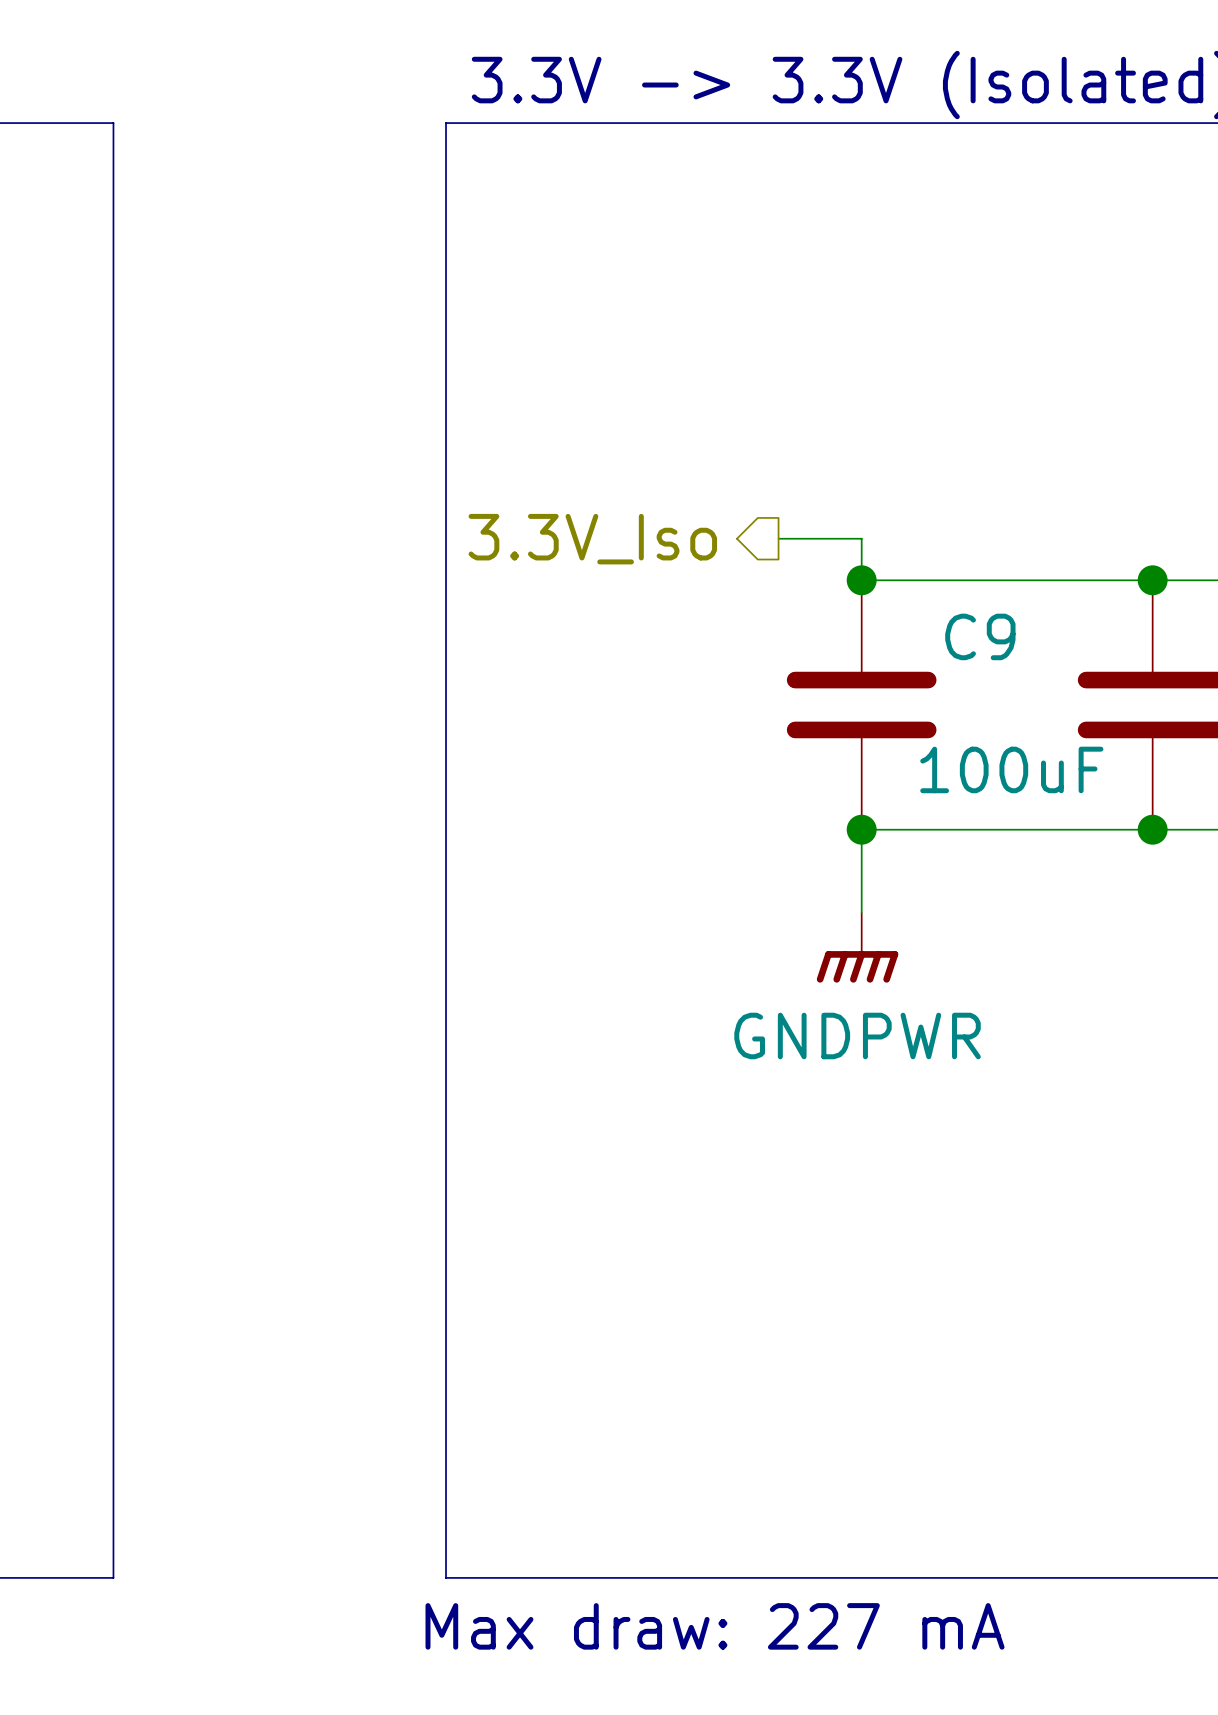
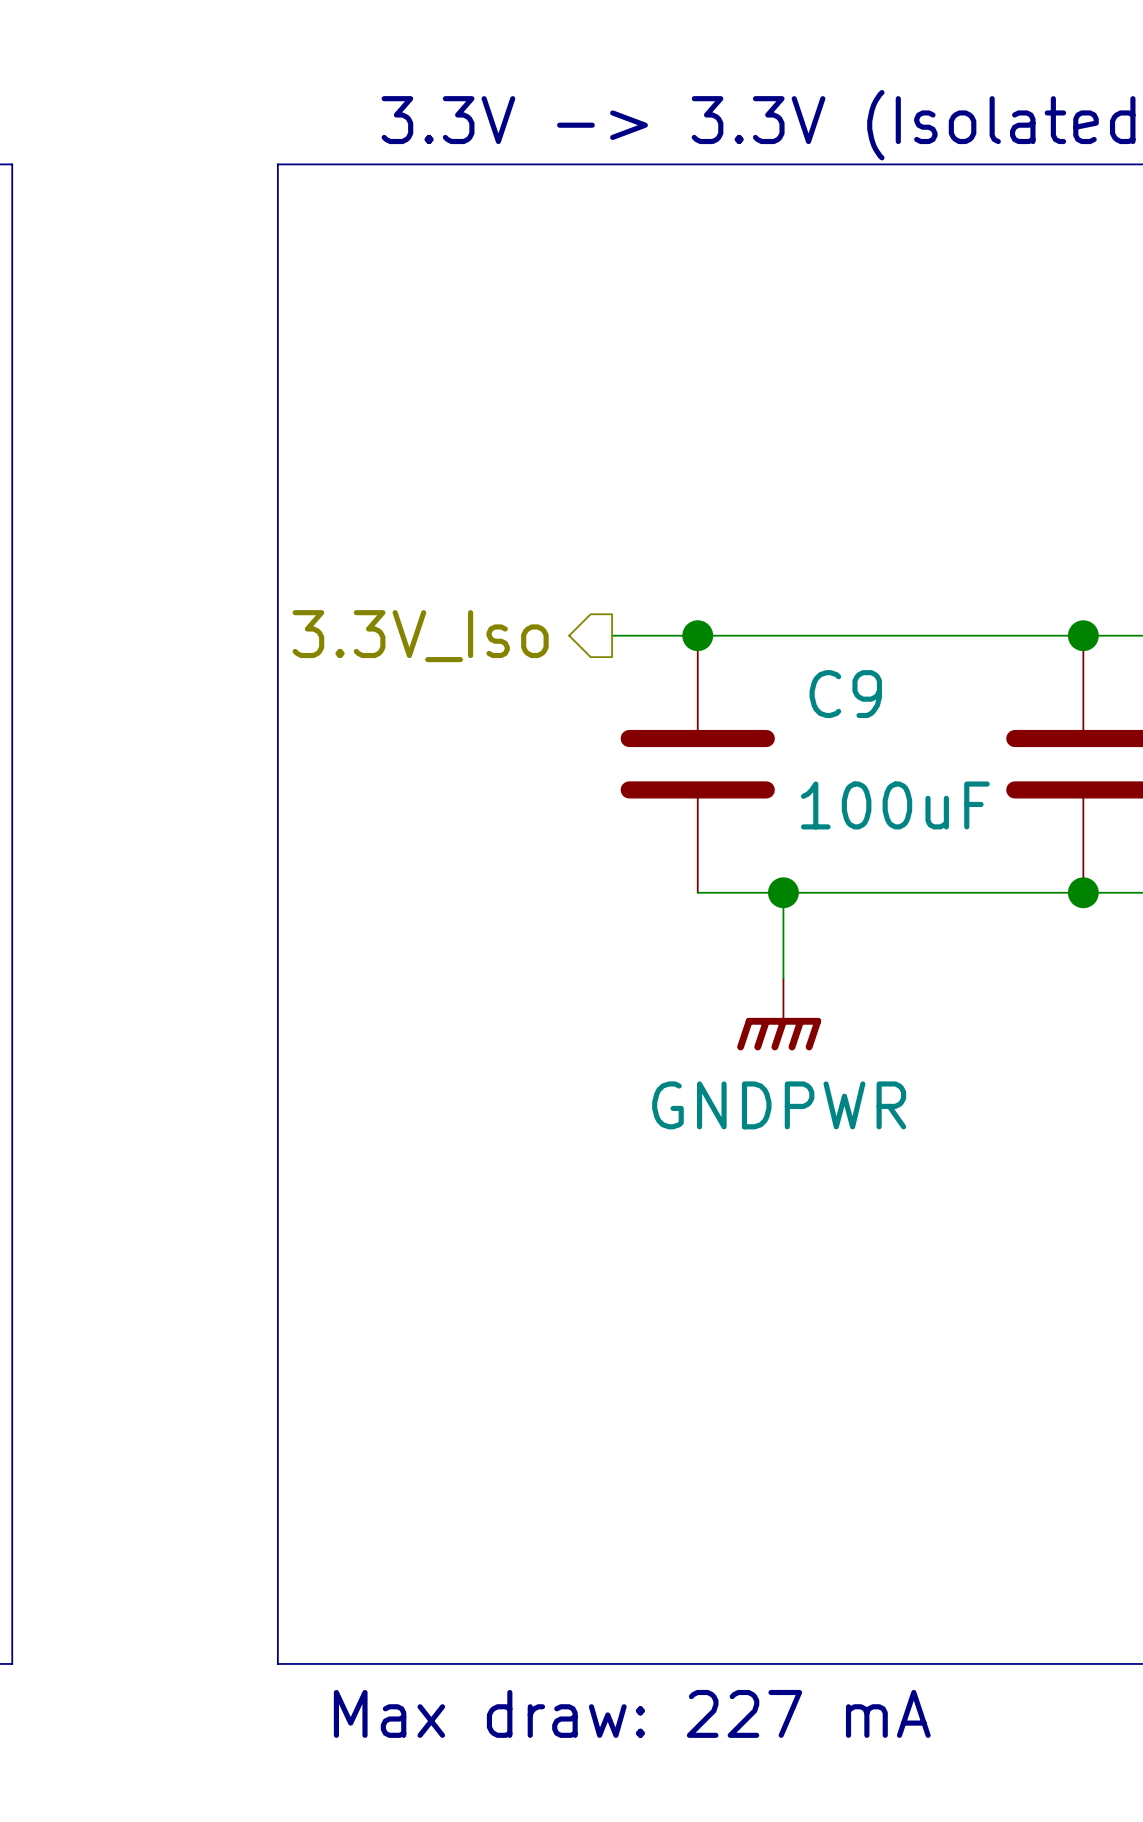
line: (446, 123) (446, 1577) -> (354, 164) (277, 164) (277, 1663) (354, 1663)
wire: (778, 538) (861, 538) (861, 580) -> (612, 635) (783, 635)
hierarchical label position: 3.3V_Iso (592, 539) -> 3.3V_Iso (420, 636)
junction position: (861, 580) -> (697, 635)
C9 name position: C9 (980, 636) -> C9 (845, 694)
C9 position: (861, 705) -> (697, 764)
C9 value position: 100uF (1011, 769) -> 100uF (895, 805)
wire: none -> (697, 892) (783, 892)

